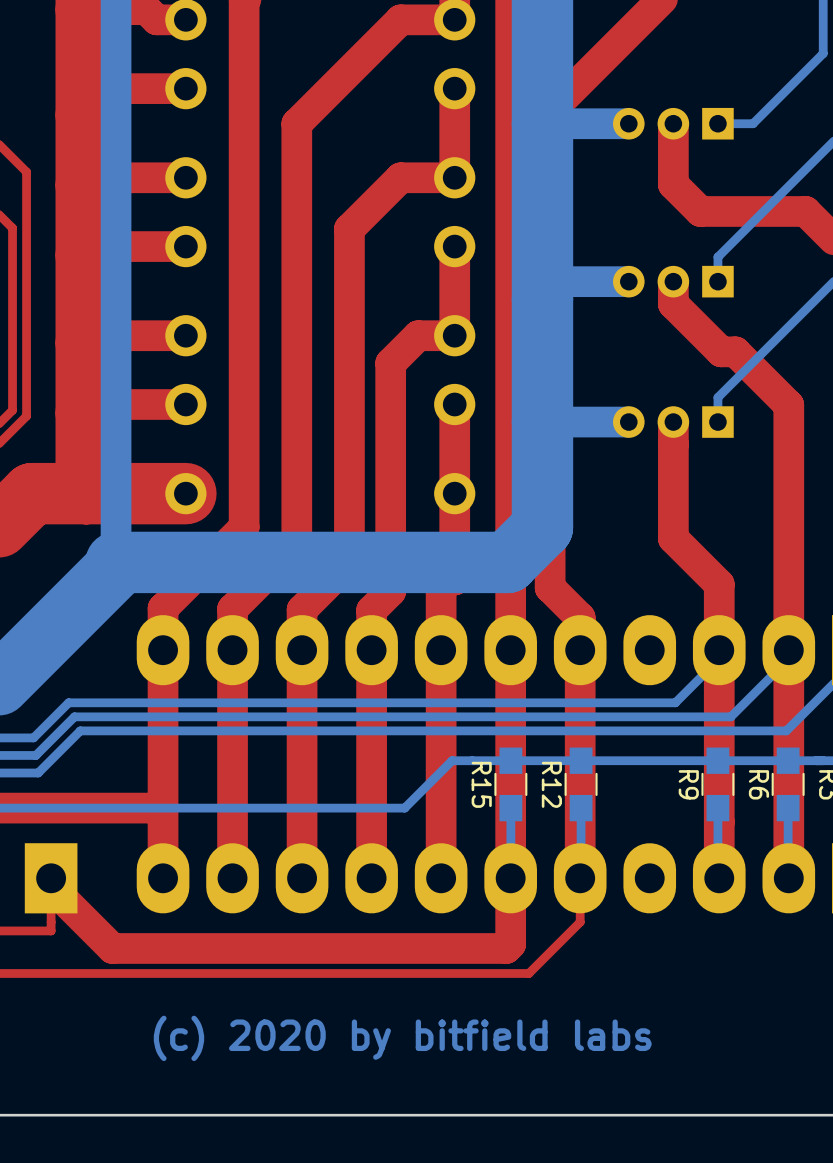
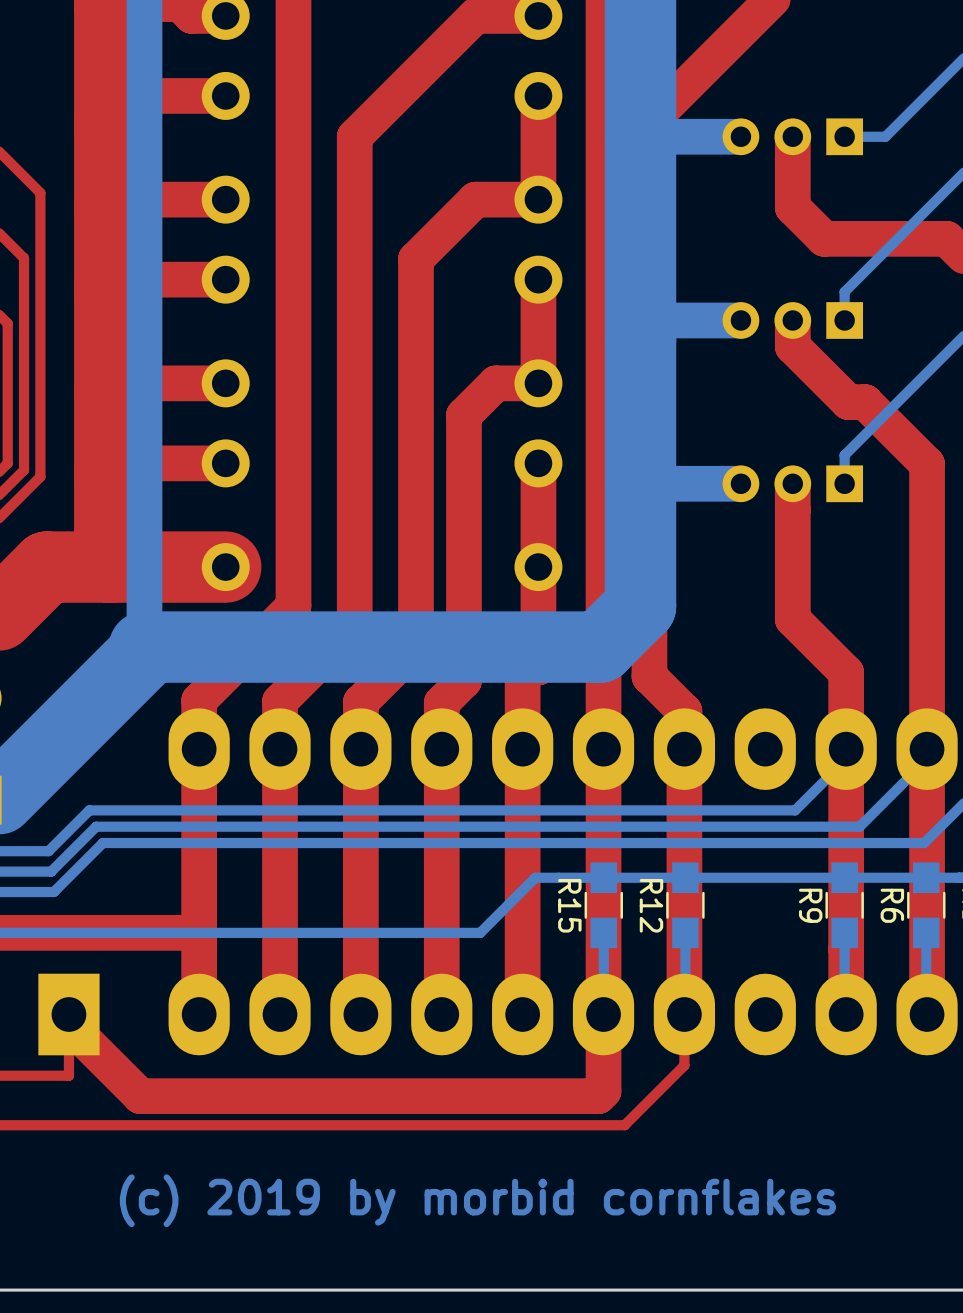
text: (c) 2020 by bitfield labs (402, 1038) -> (c) 2019 by morbid cornflakes (477, 1200)

